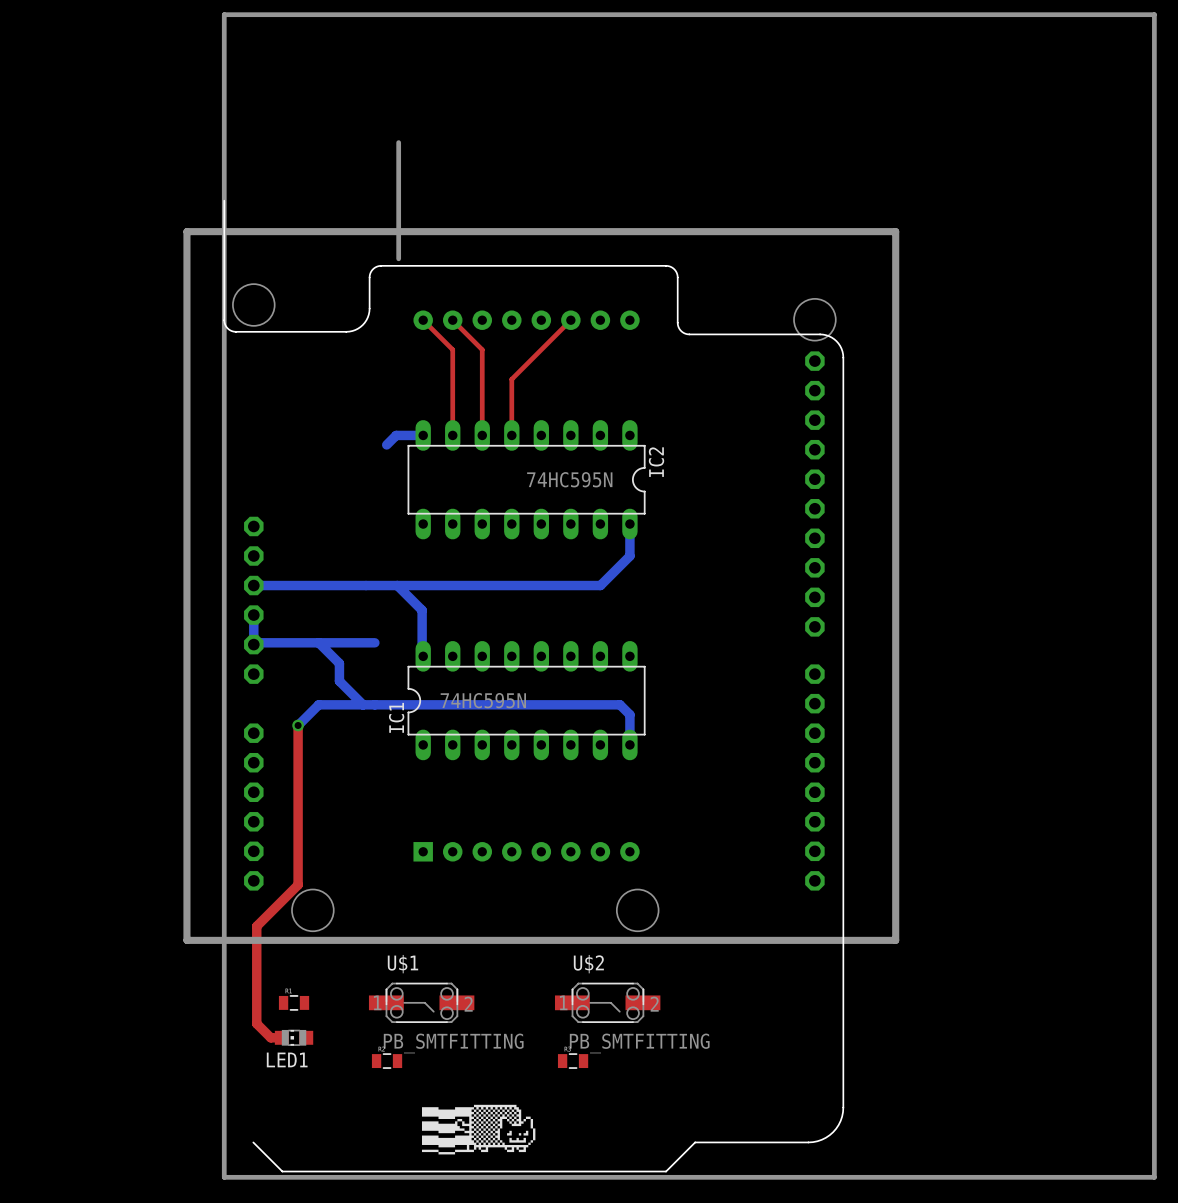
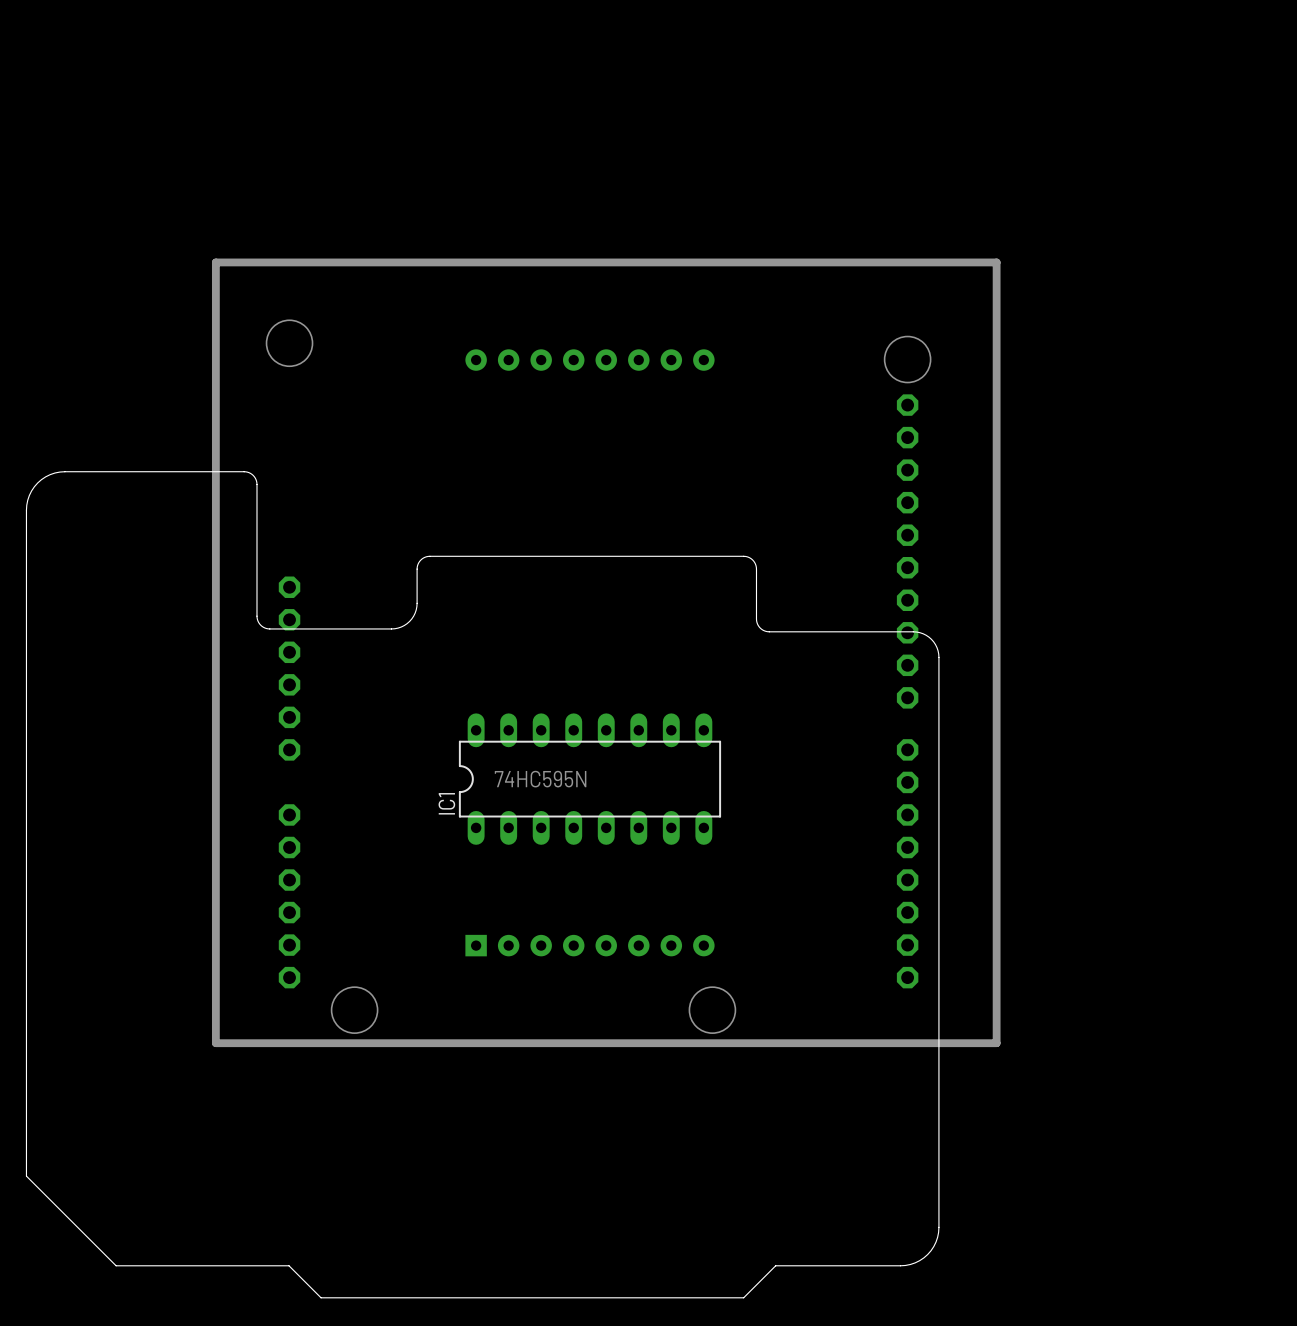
line: (224, 14) (1154, 14) (1154, 1177) (224, 1177) (224, 14) -> none
line: (398, 142) (398, 258) -> none
board edge: (224, 200) (224, 321) (226, 327) (232, 331) (346, 331) (355, 330) (362, 325) (367, 317) (370, 274) (374, 268) (379, 265) (666, 265) (673, 268) (677, 274) (677, 324) (680, 329) (684, 333) (820, 334) (831, 337) (840, 346) (843, 357) (843, 590) -> (289, 1265) (116, 1265) (26, 1176) (26, 510) (29, 495) (37, 482) (50, 474) (64, 471) (244, 471) (250, 473) (255, 478) (256, 484) (257, 617) (260, 625) (268, 628) (391, 628) (401, 627) (409, 621) (415, 613) (417, 565) (422, 558) (428, 556) (743, 556) (751, 558) (756, 565) (756, 620) (762, 630) (769, 631) (916, 632) (926, 635) (933, 641) (938, 657)
top track: (423, 320) (452, 349) (452, 435) -> none
top track: (452, 320) (482, 349) (482, 435) -> none
top track: (570, 320) (511, 379) (511, 435) -> none
bottom track: (423, 435) (396, 435) (386, 444) -> none
IC2: 74HC595N (526, 479) -> none
bottom track: (629, 524) (629, 556) (600, 585) (253, 585) -> none
bottom track: (397, 585) (422, 610) (423, 656) -> none
bottom track: (253, 615) (253, 644) (255, 642) (374, 642) -> none
bottom track: (318, 642) (339, 663) (339, 681) (363, 704) -> none
bottom track: (298, 725) (318, 704) (619, 704) (629, 714) (629, 744) -> none
top track: (298, 725) (298, 884) (256, 926) (256, 1023) (270, 1037) (281, 1037) -> none
via: (298, 725) -> none
part: (294, 1002) -> none
U$1: PB_SMTFITTING (421, 1002) -> none
U$2: PB_SMTFITTING (607, 1002) -> none
LED1: (294, 1037) -> none
part: (387, 1061) -> none
part: (573, 1061) -> none
drawing: [421, 1104, 536, 1155] -> none

